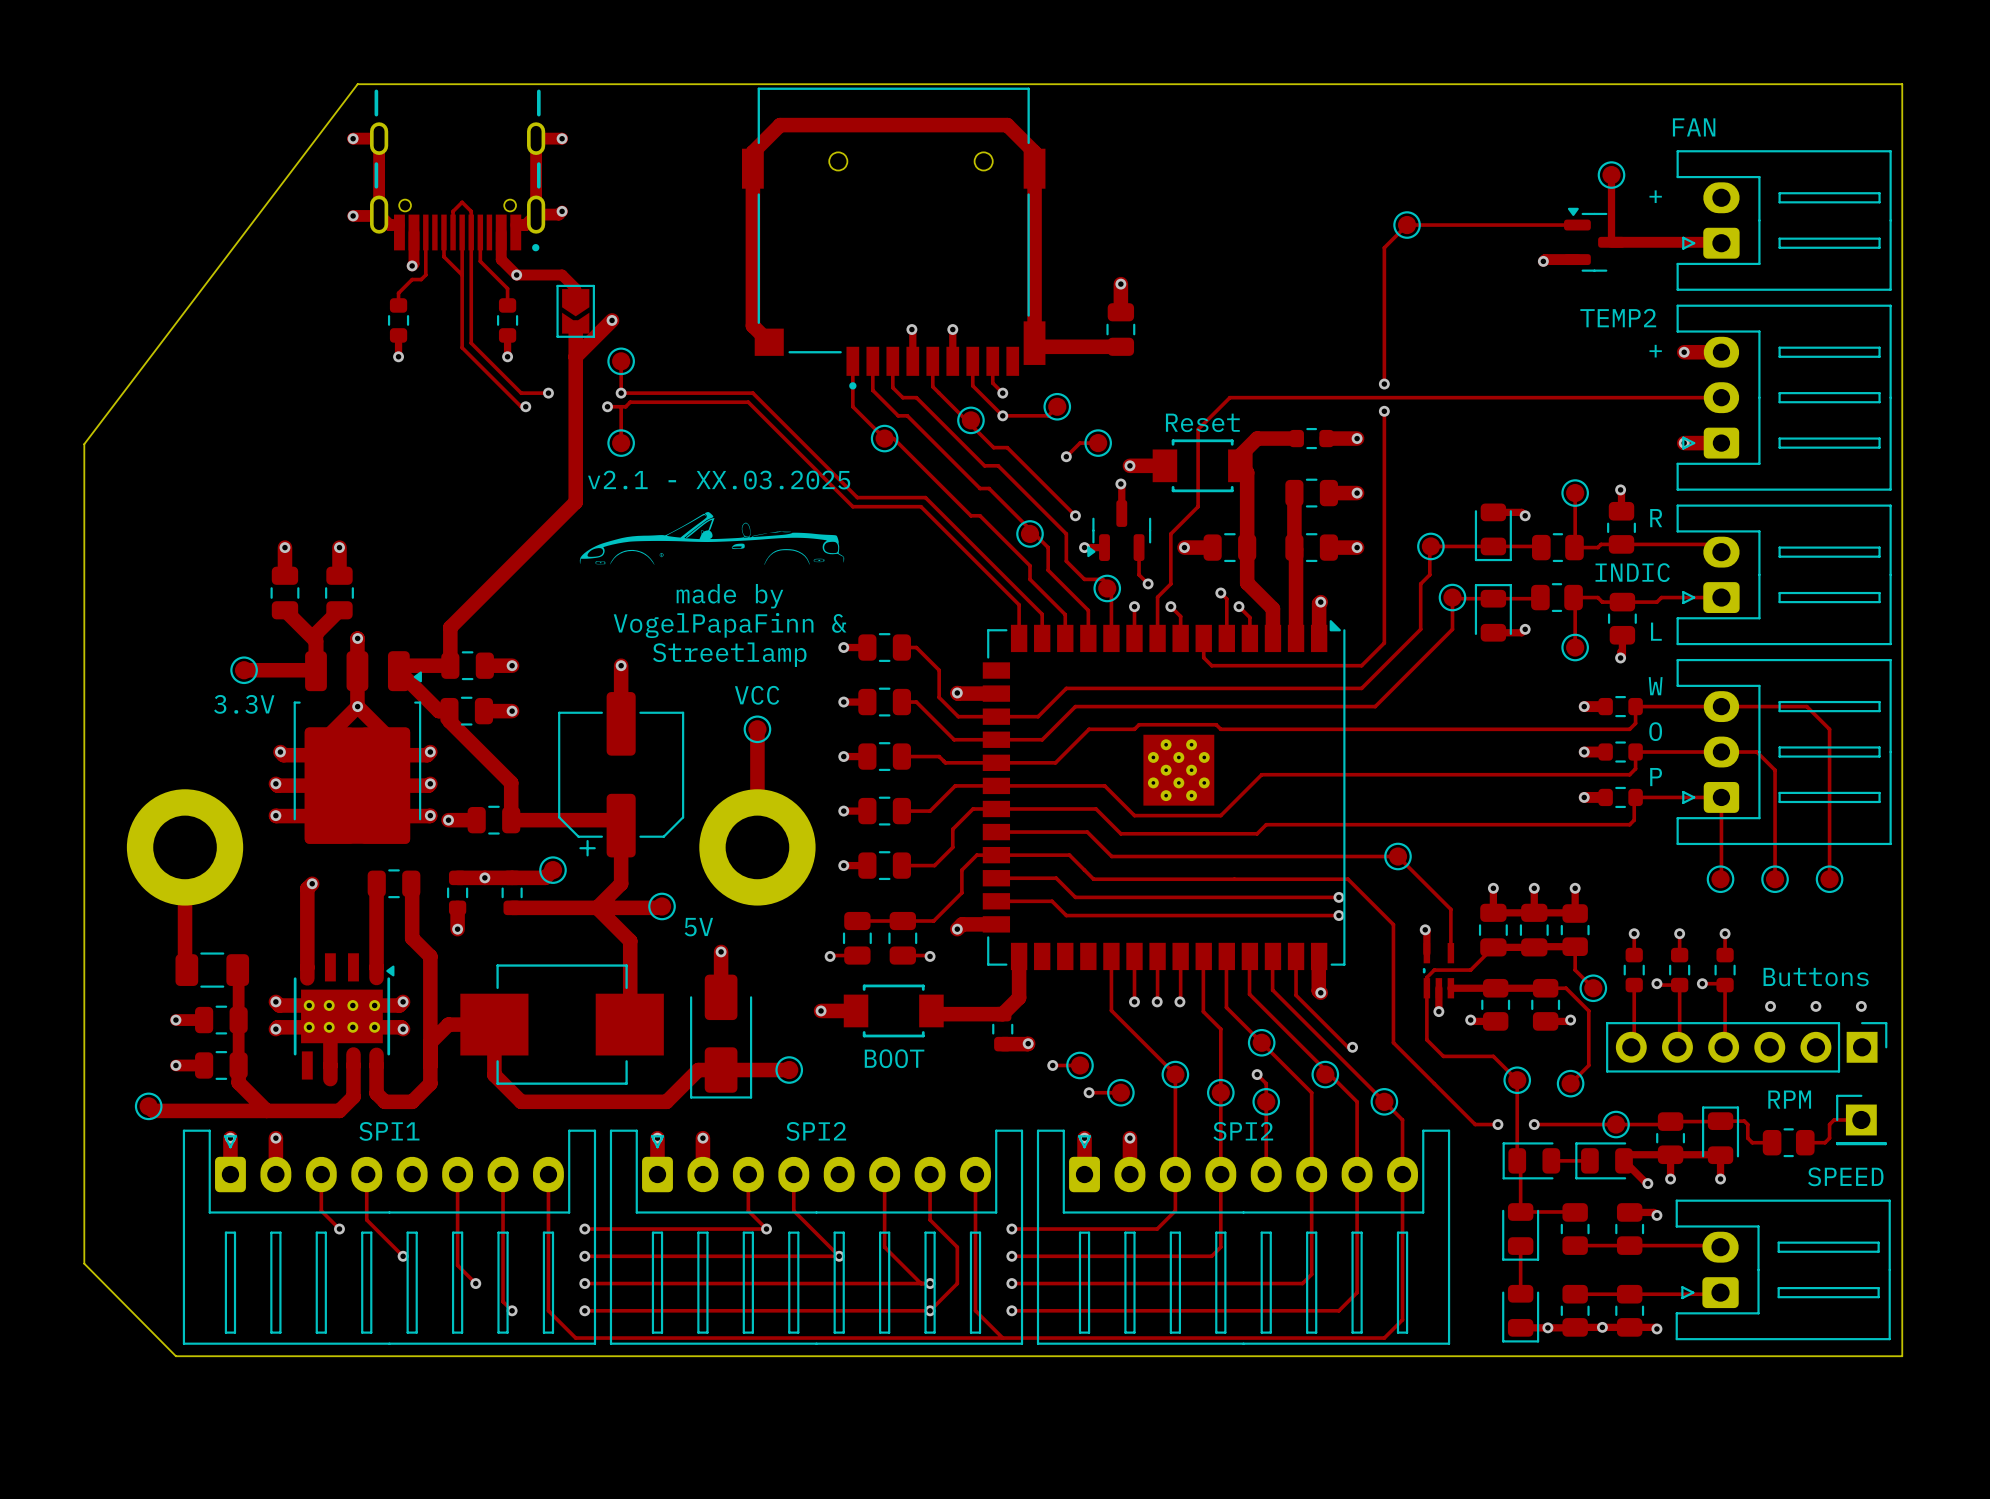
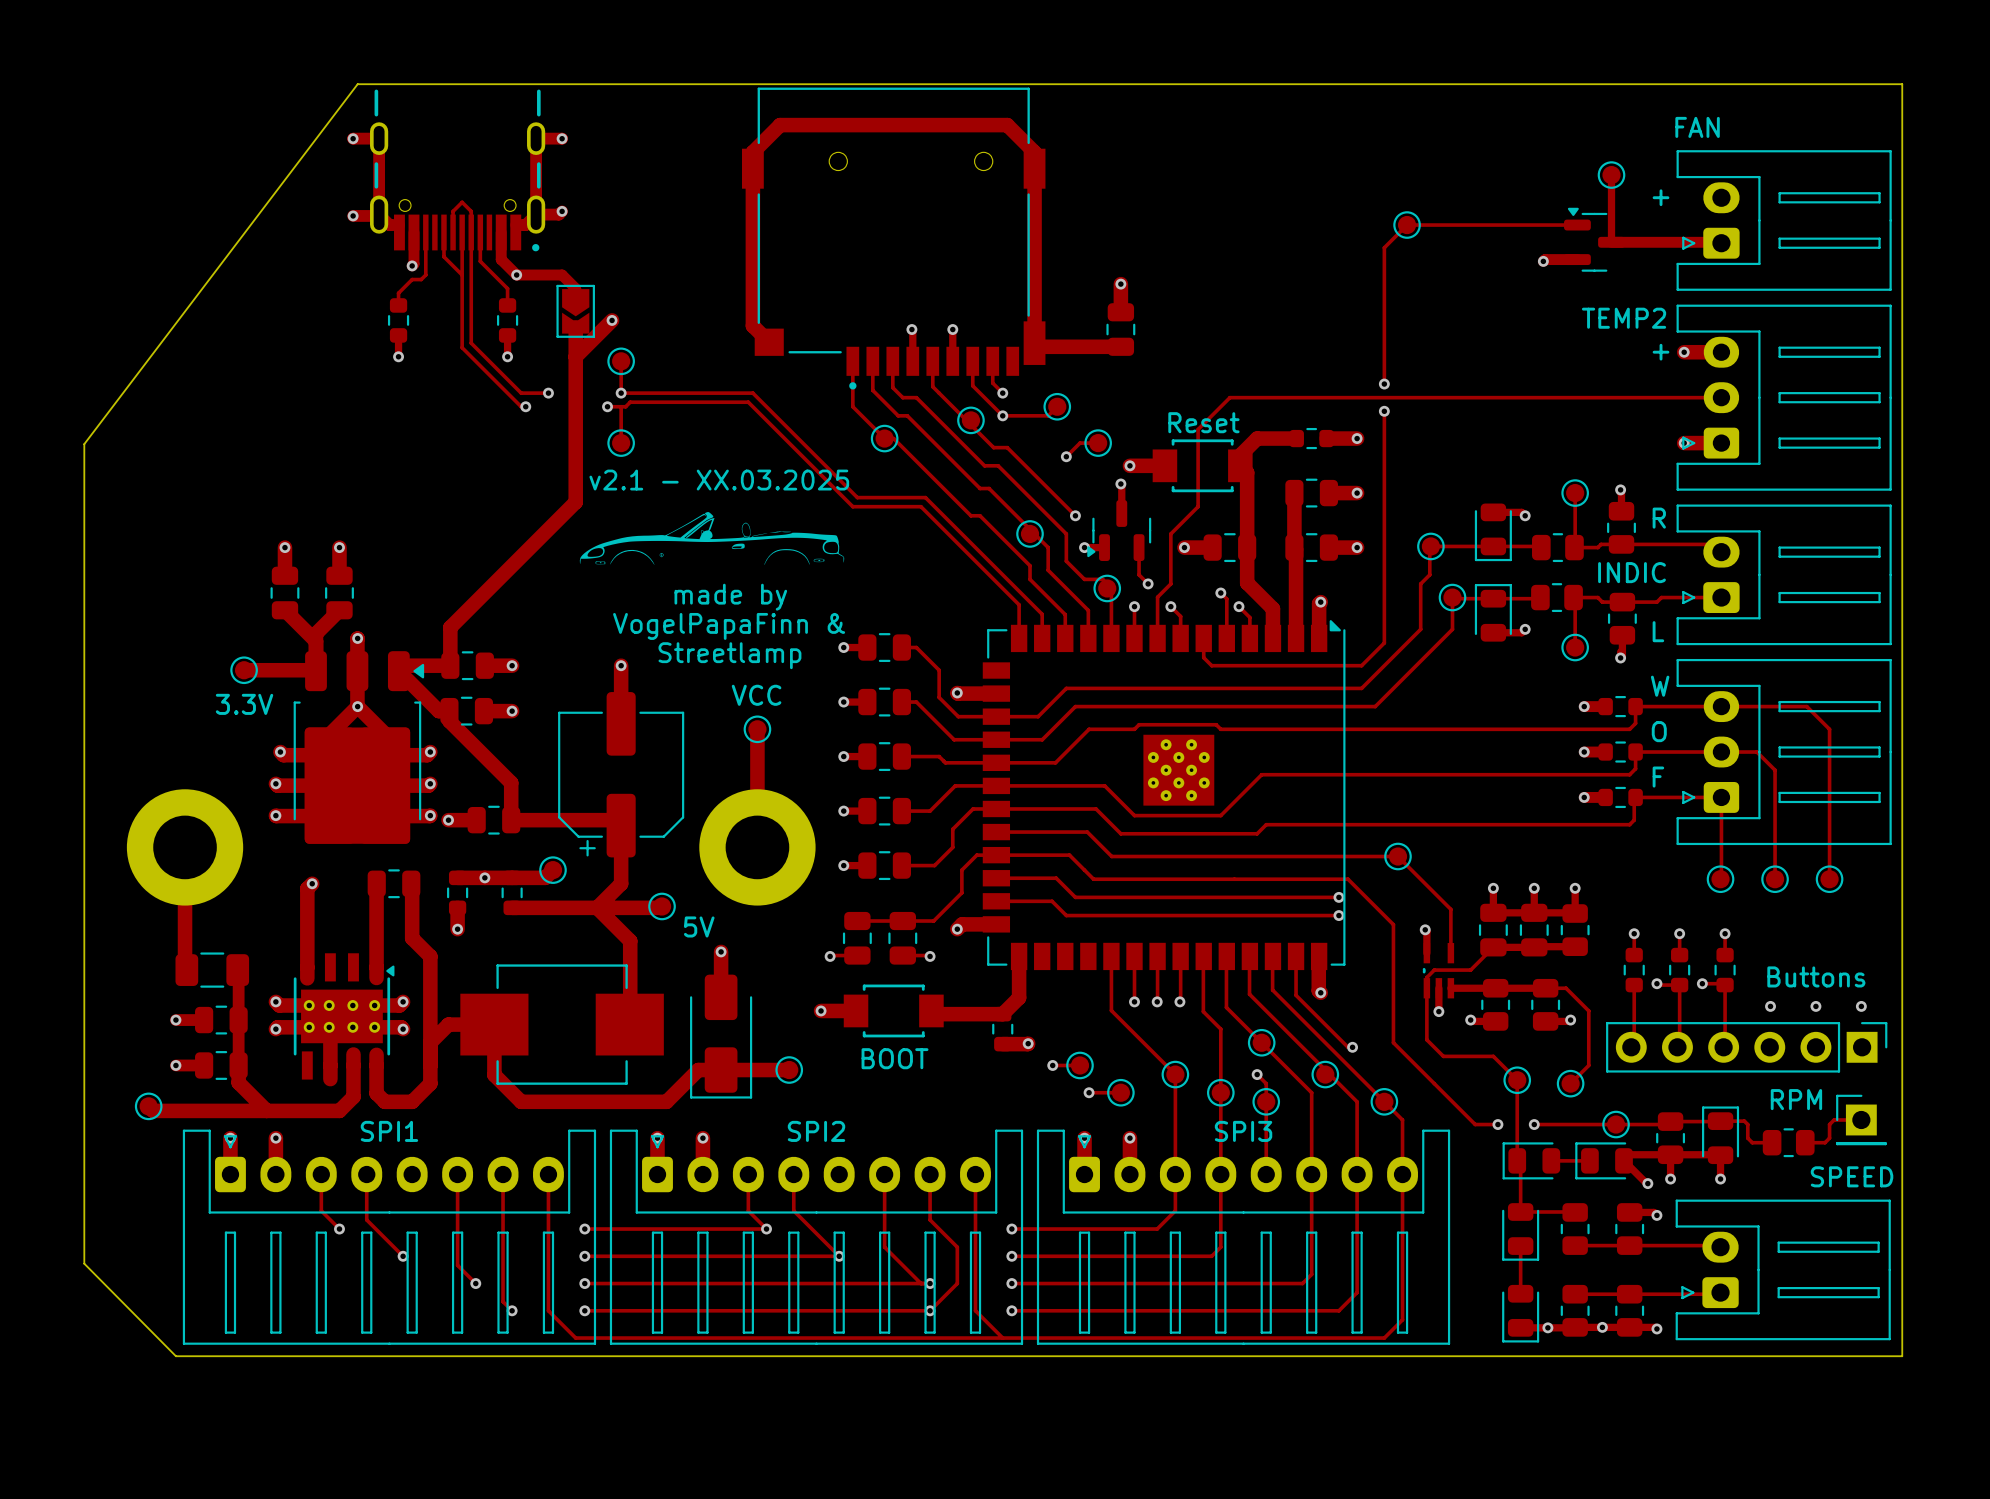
part footprint: [293, 651, 422, 844] -> [293, 651, 425, 844]
text: P (1656, 777) -> F (1658, 777)
track: (1575, 946) (1575, 970) (1593, 988) -> none
part: (1593, 988) -> none
text: SPI2 (1243, 1131) -> SPI3 (1243, 1131)

